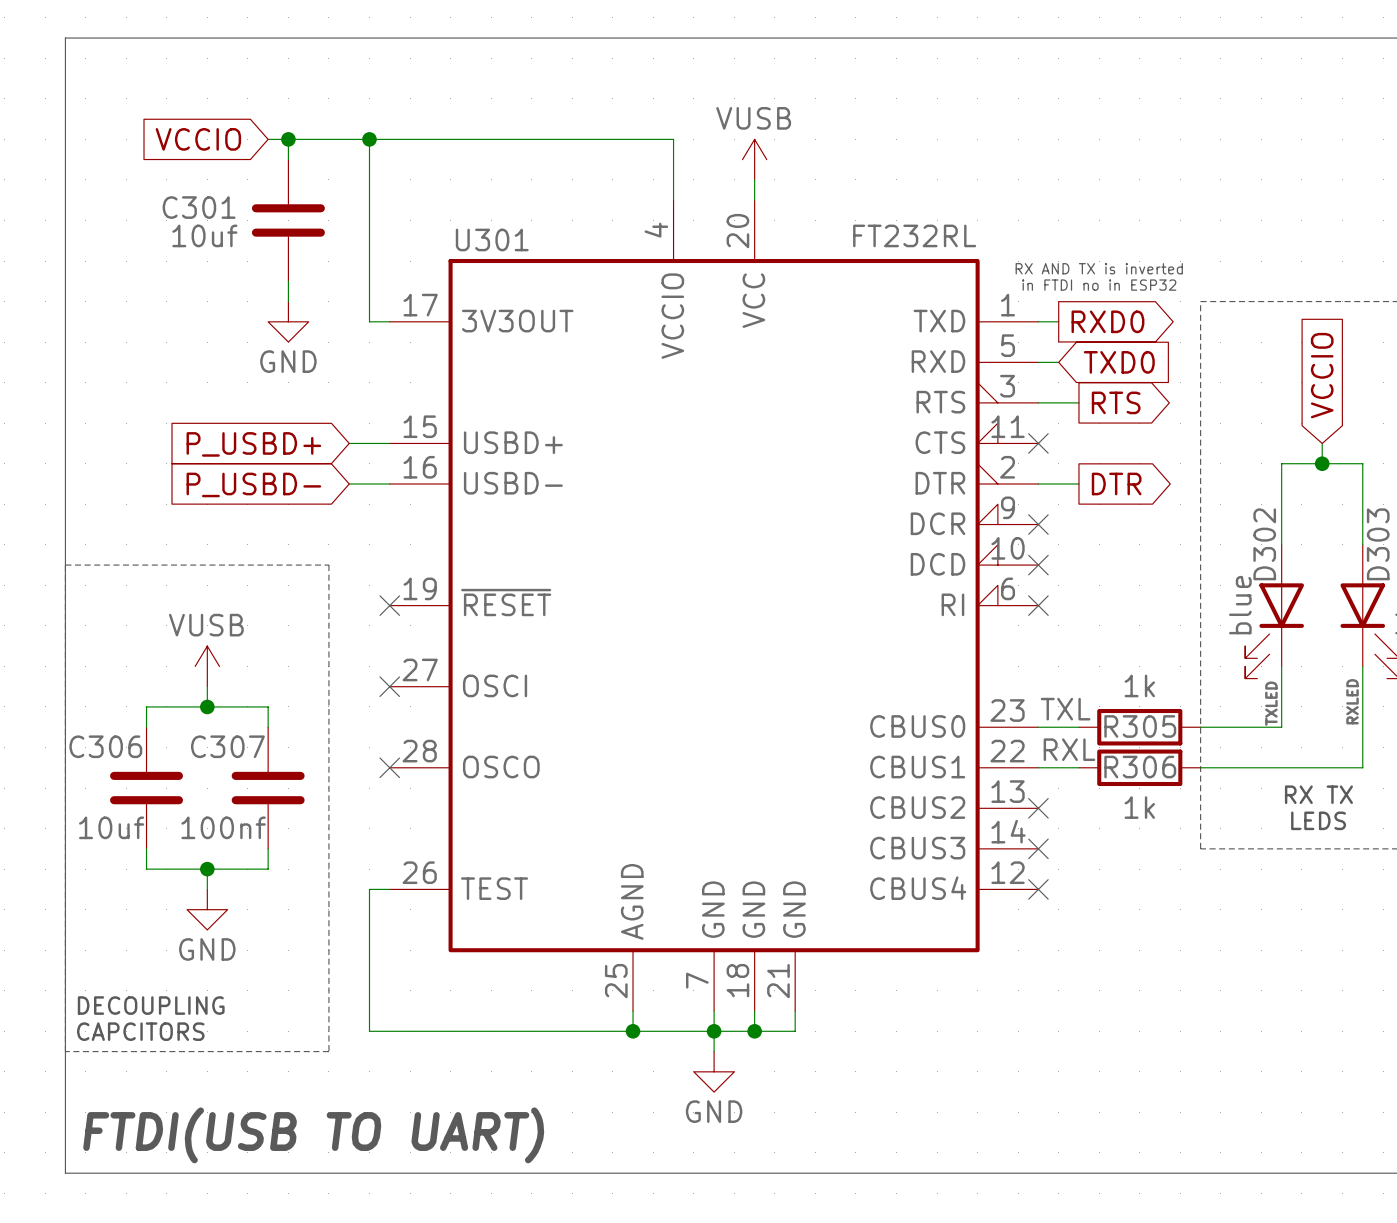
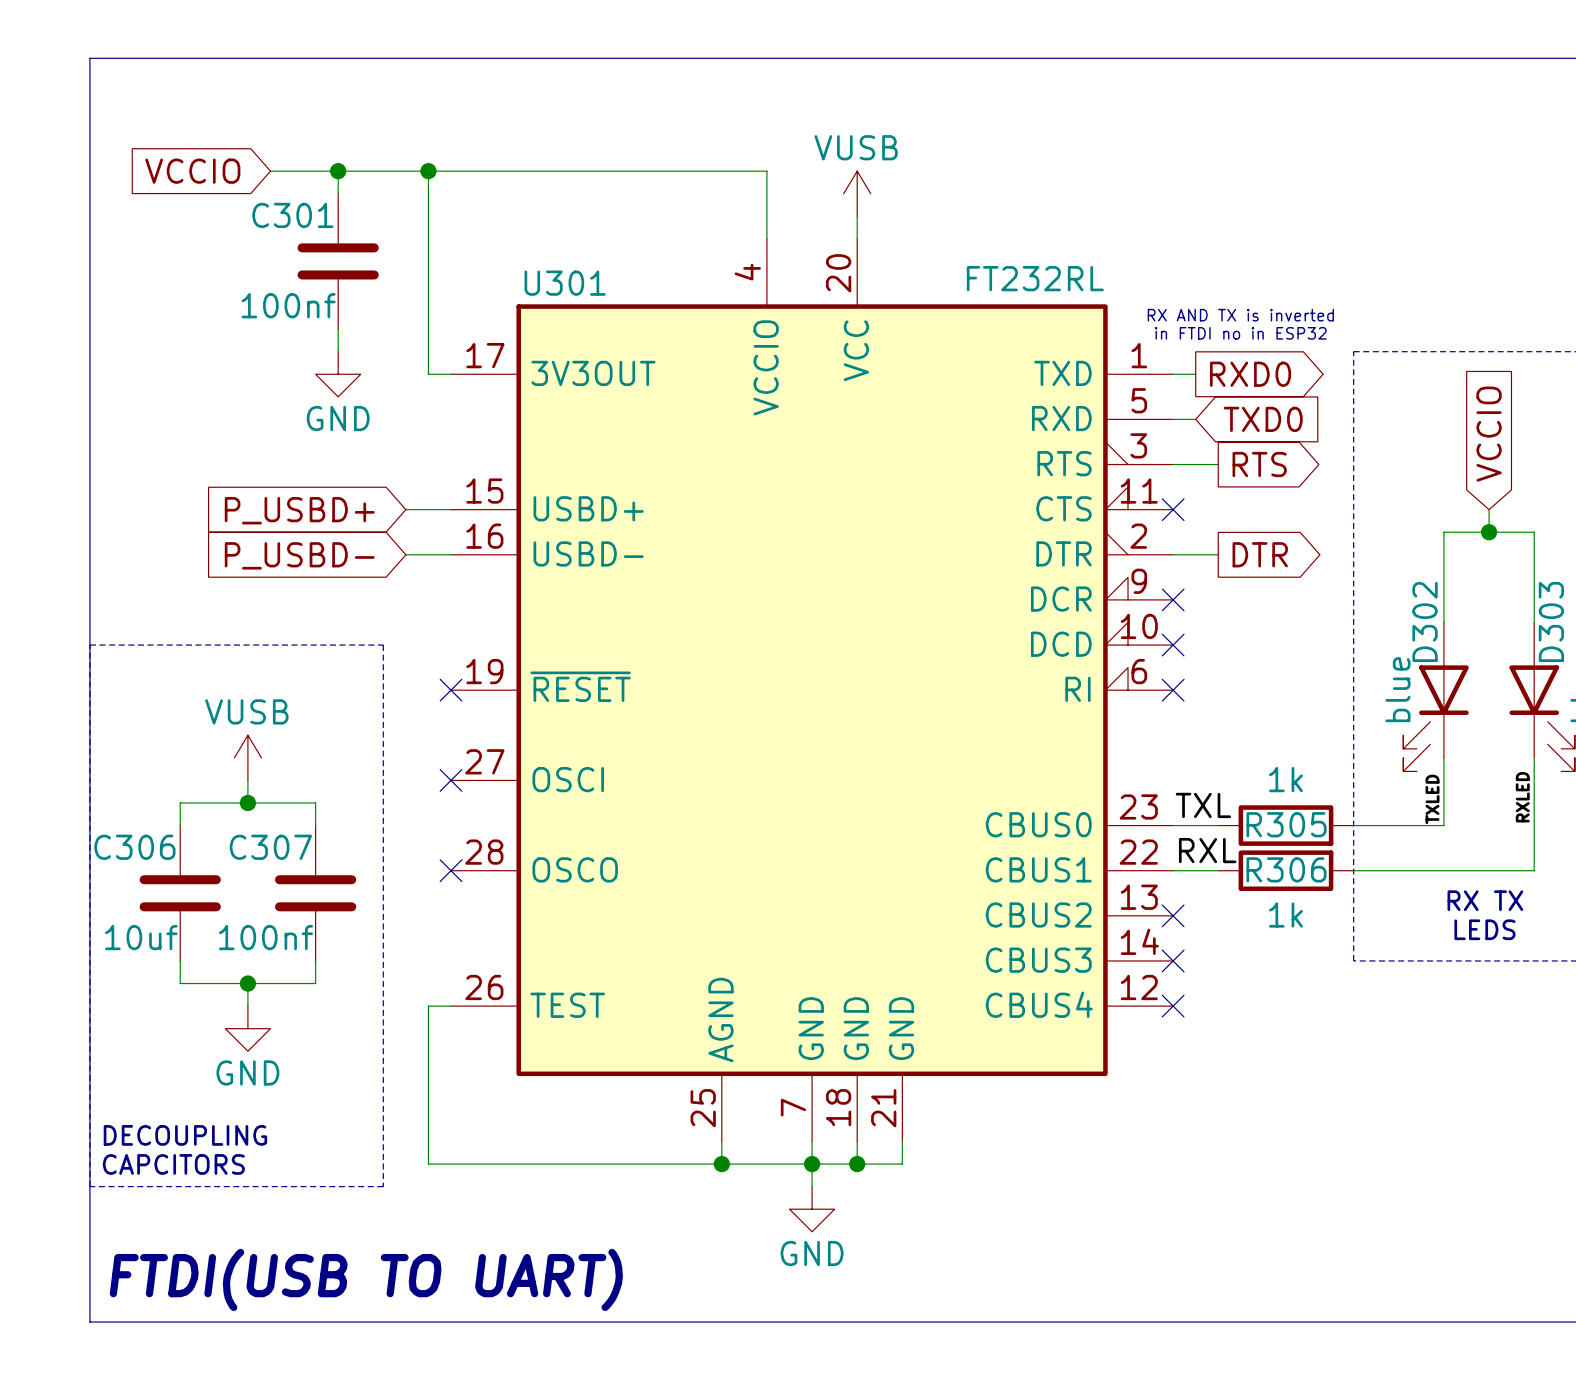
global label position: VCCIO (198, 139) -> VCCIO (192, 171)
wire: none -> (270, 171) (315, 171)
C301 name position: C301 (199, 207) -> C301 (292, 215)
C301 value: 10uf (204, 235) -> 100nf (288, 305)

